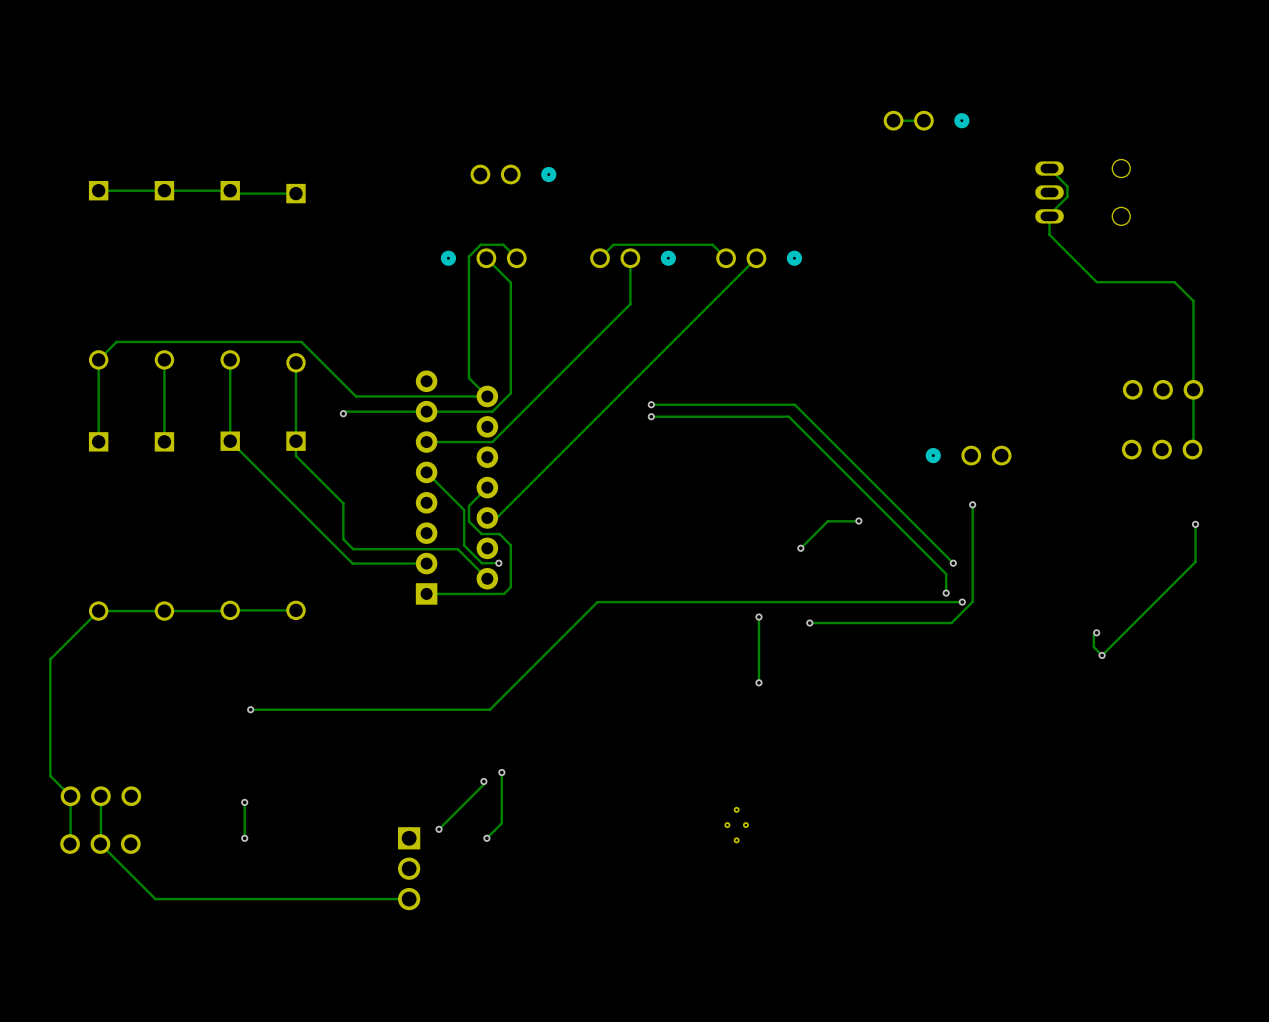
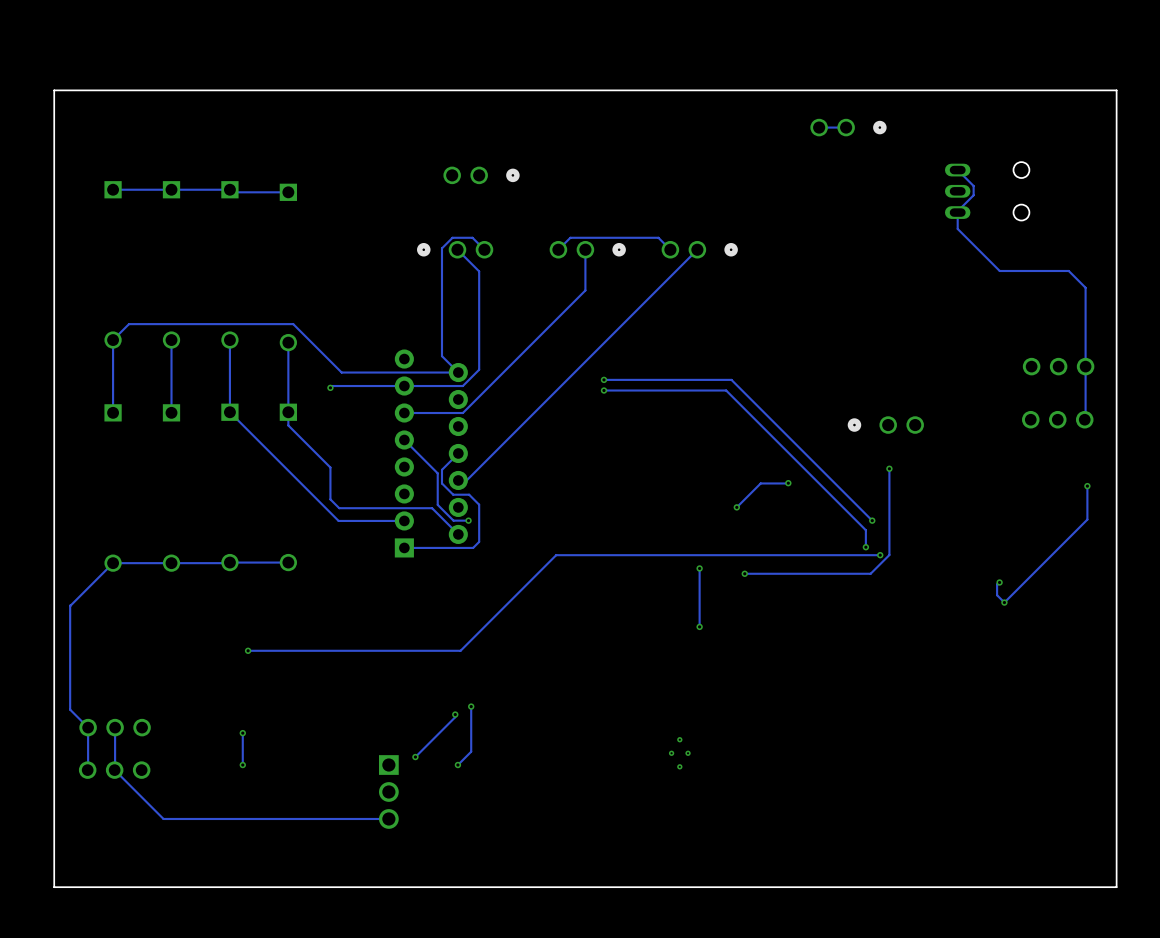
board edge: none -> (1116, 90) (54, 90) (54, 887) (1116, 887) (1116, 90)

